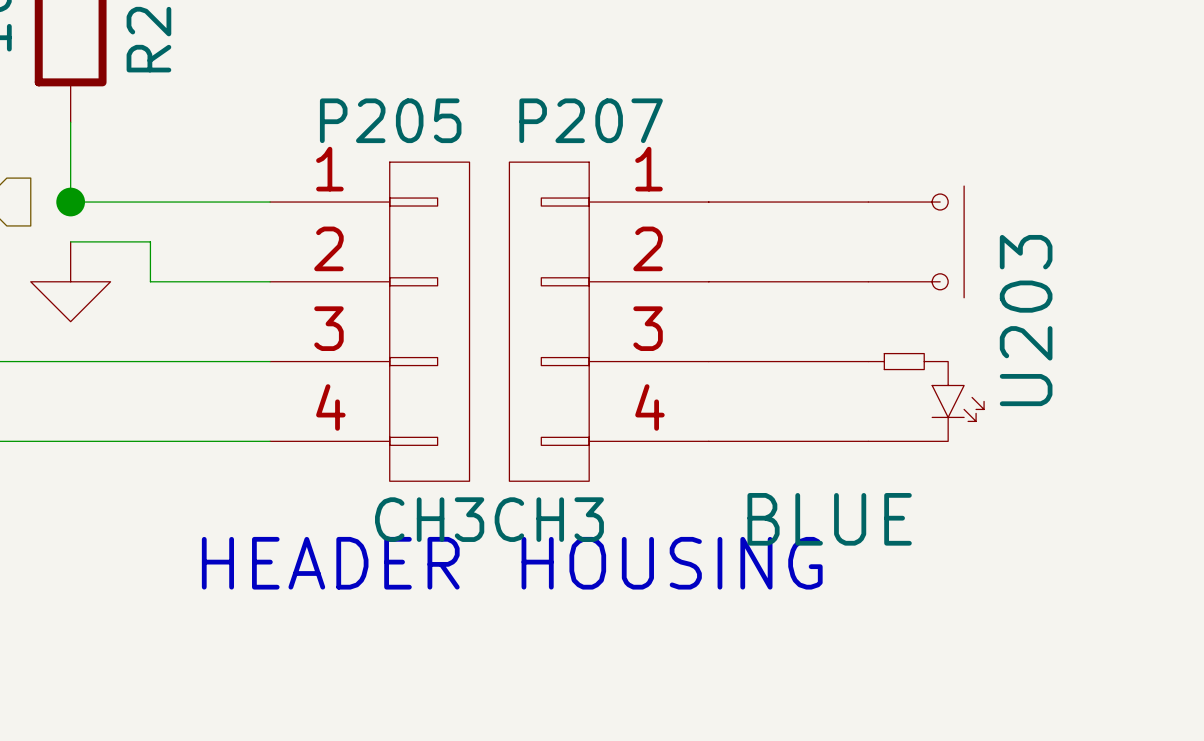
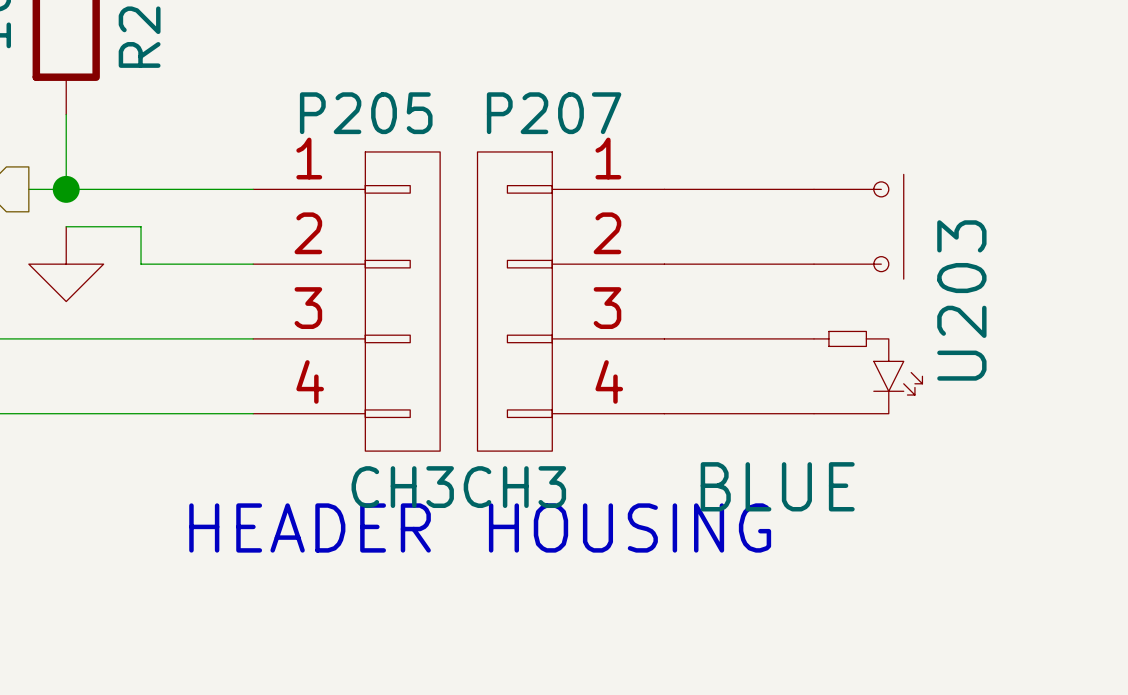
wire: none -> (28, 189) (66, 189)

